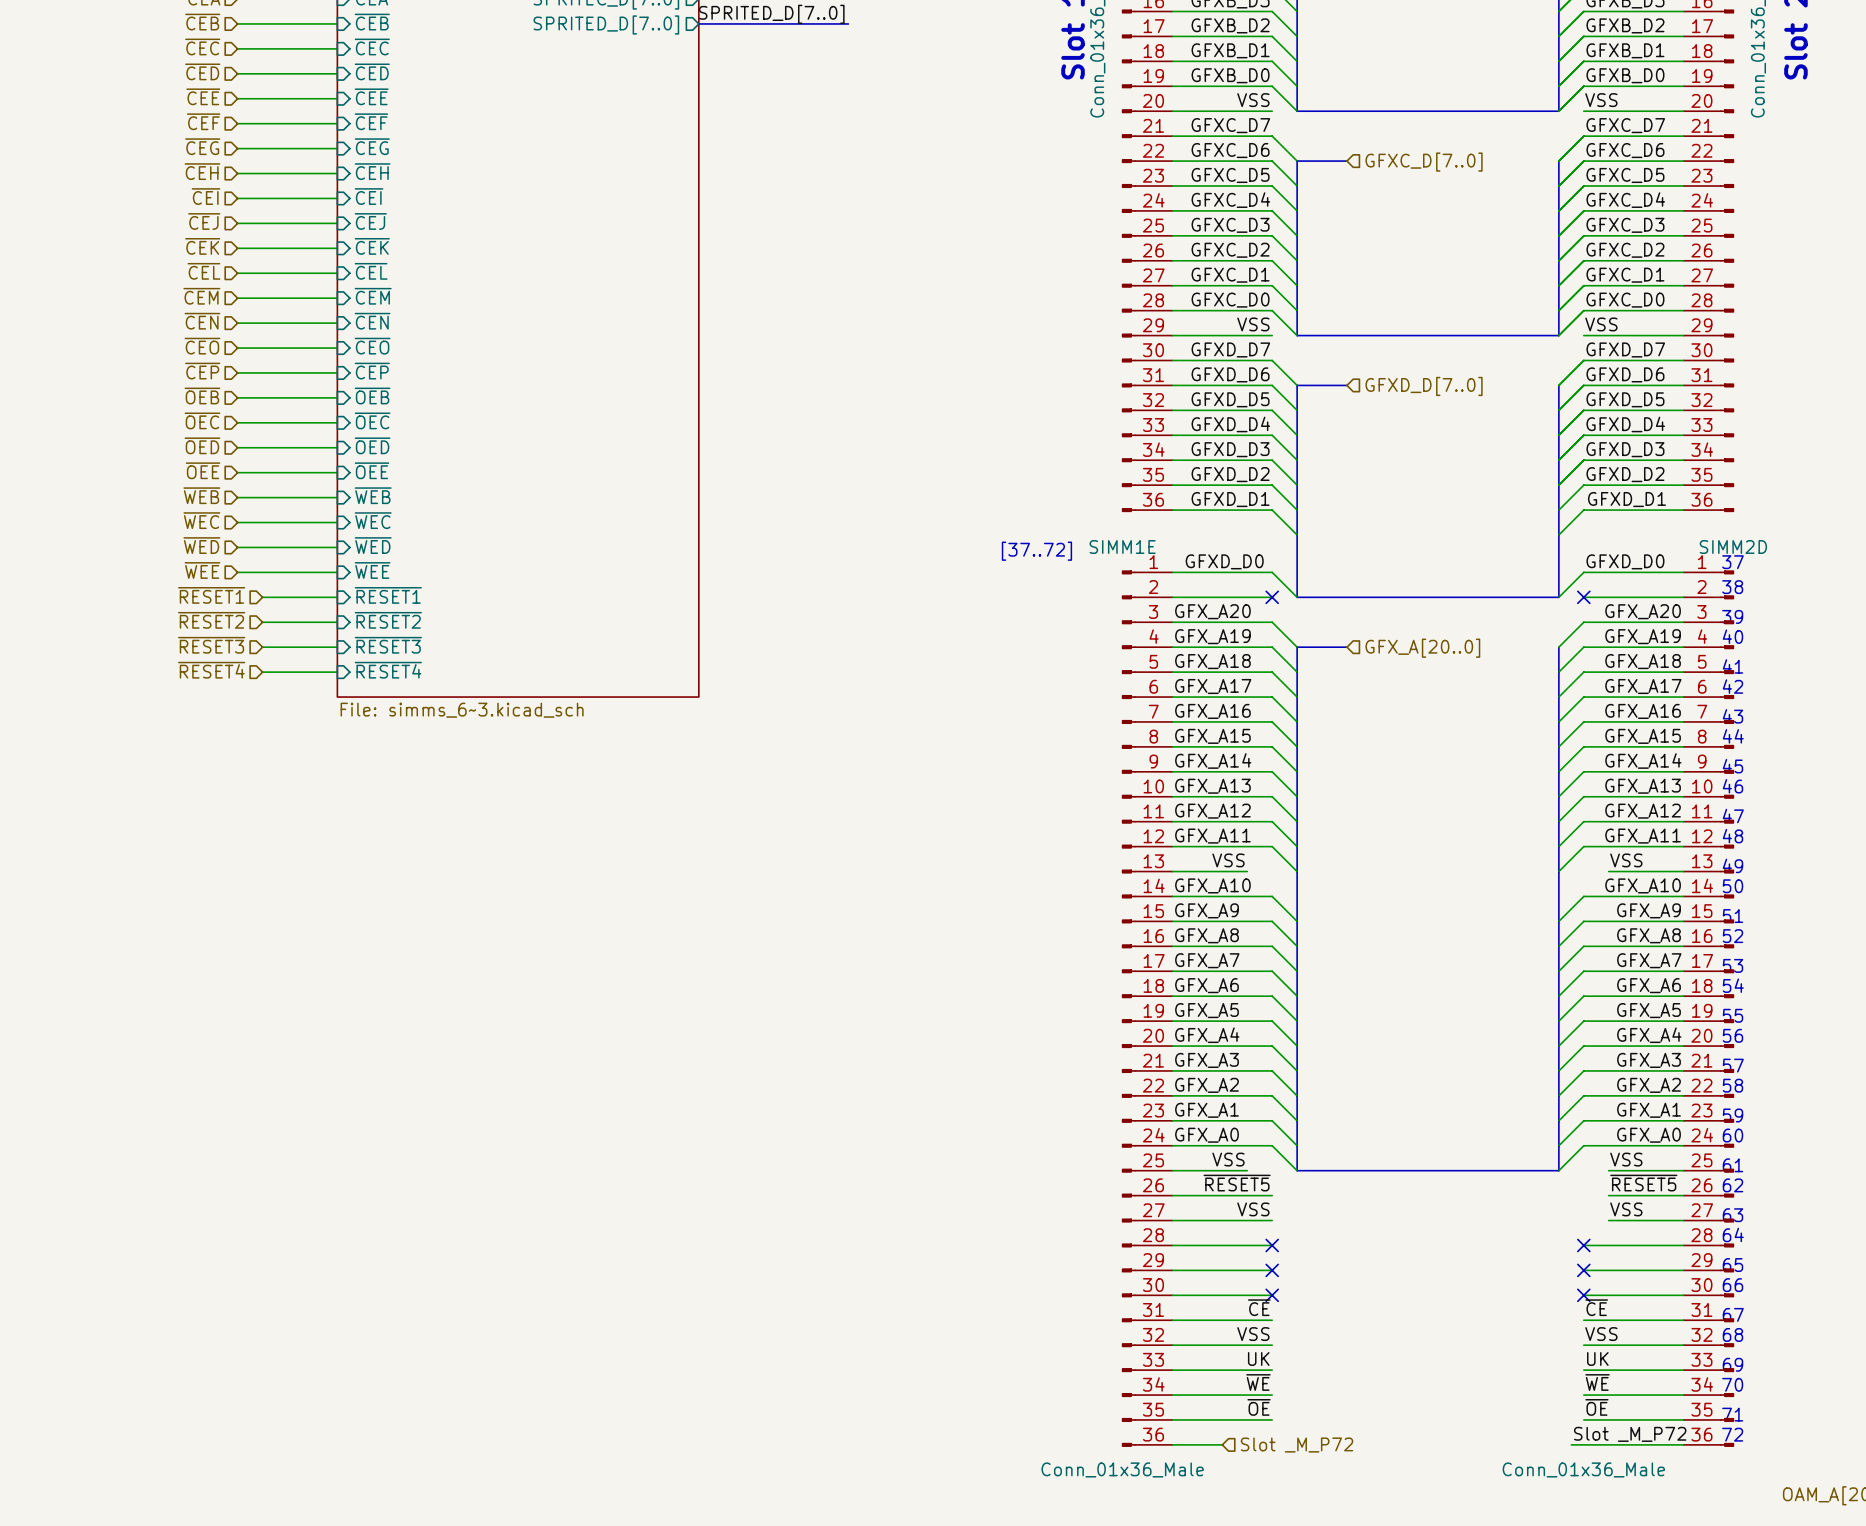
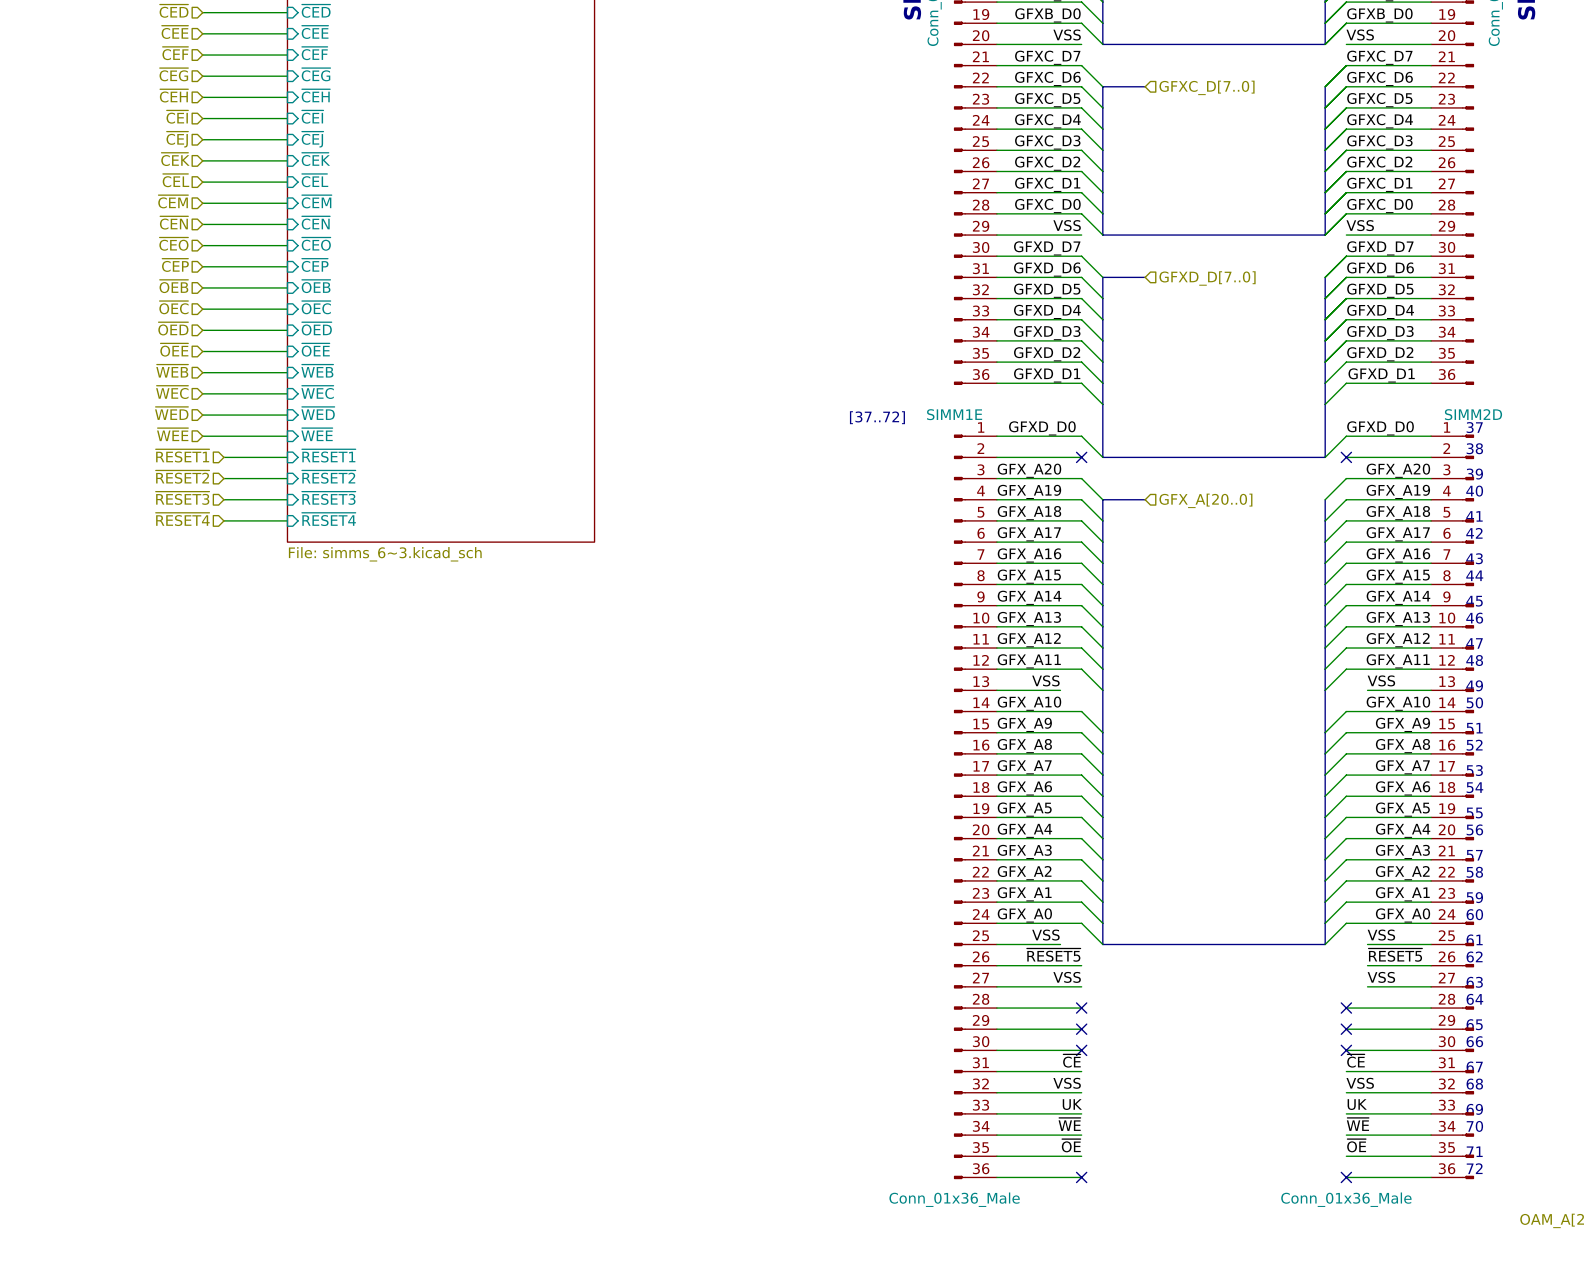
label: Slot _M_P72 (1630, 1434) -> none
wire: none -> (1039, 1177) (1081, 1177)
no-connect mark: none -> (1081, 1177)
wire: (1571, 1444) (1583, 1444) -> none
no-connect mark: none -> (1346, 1177)
hierarchical label: Slot _M_P72 (1297, 1445) -> none

